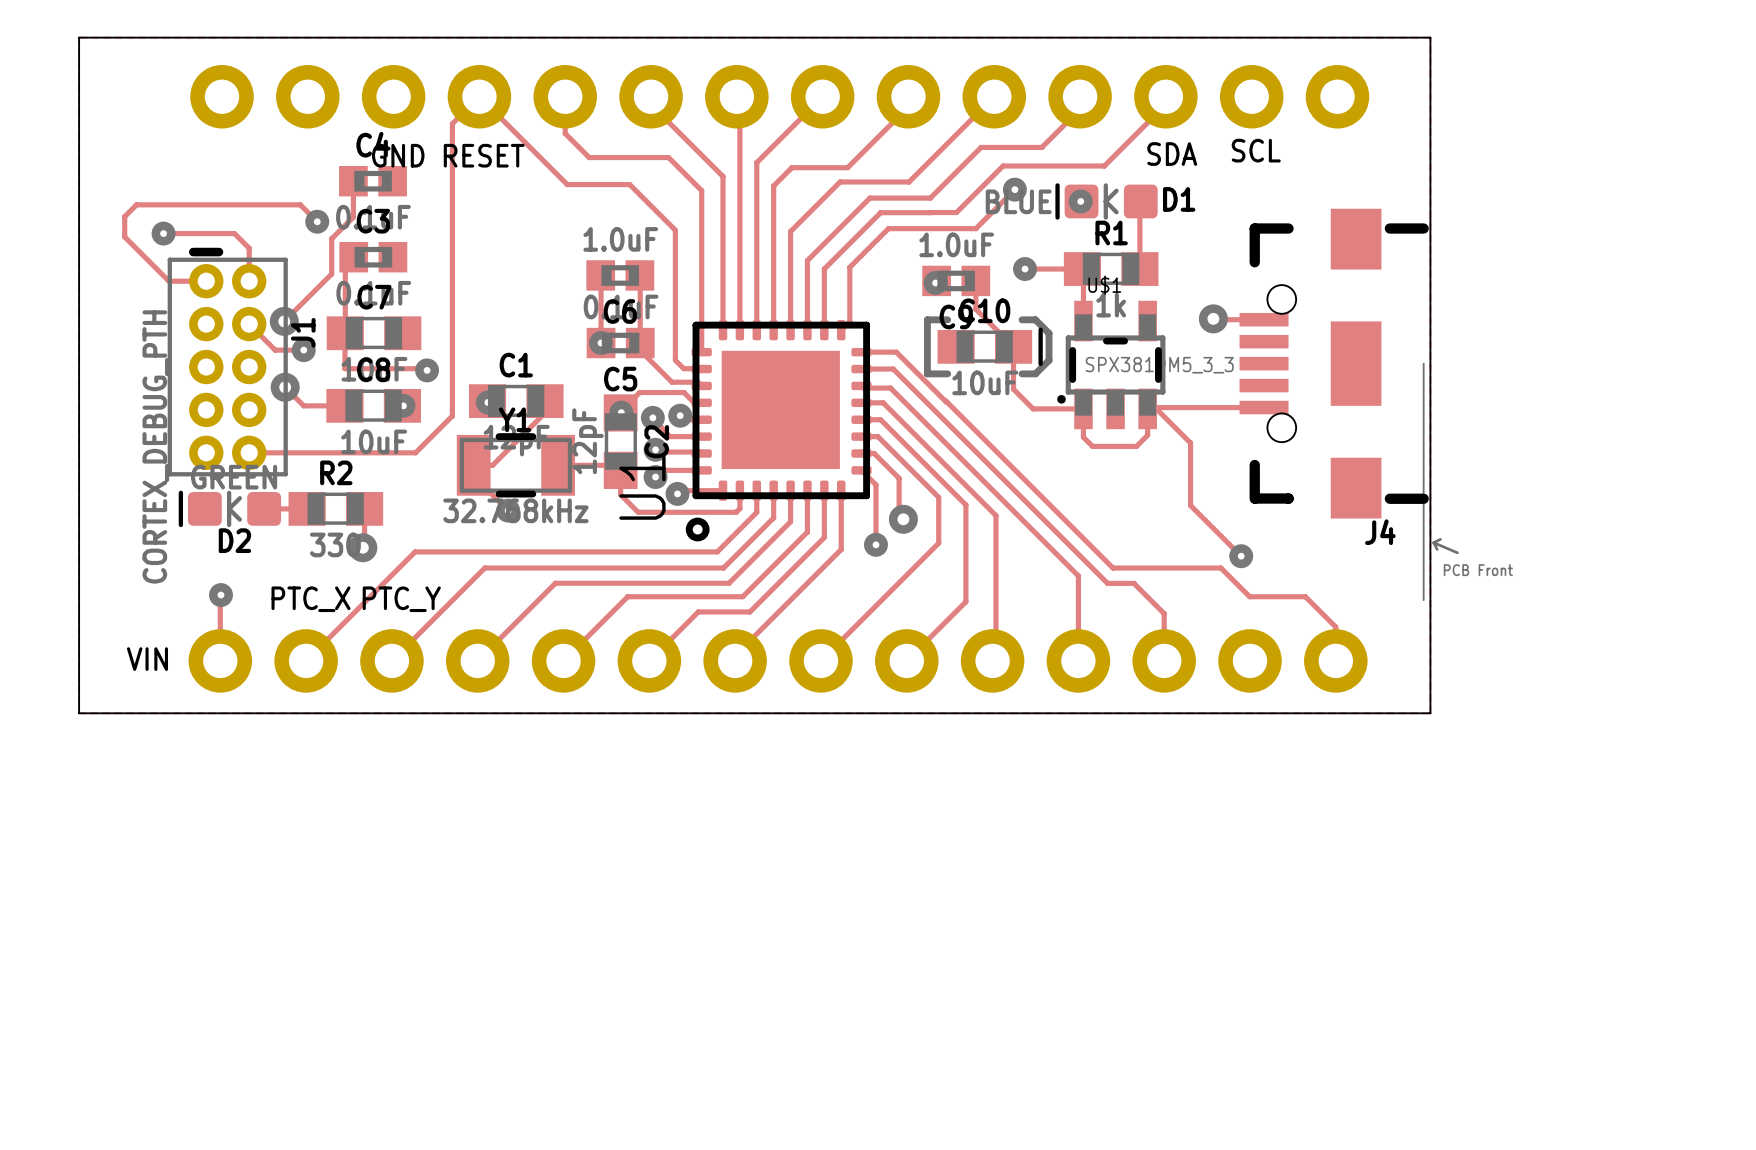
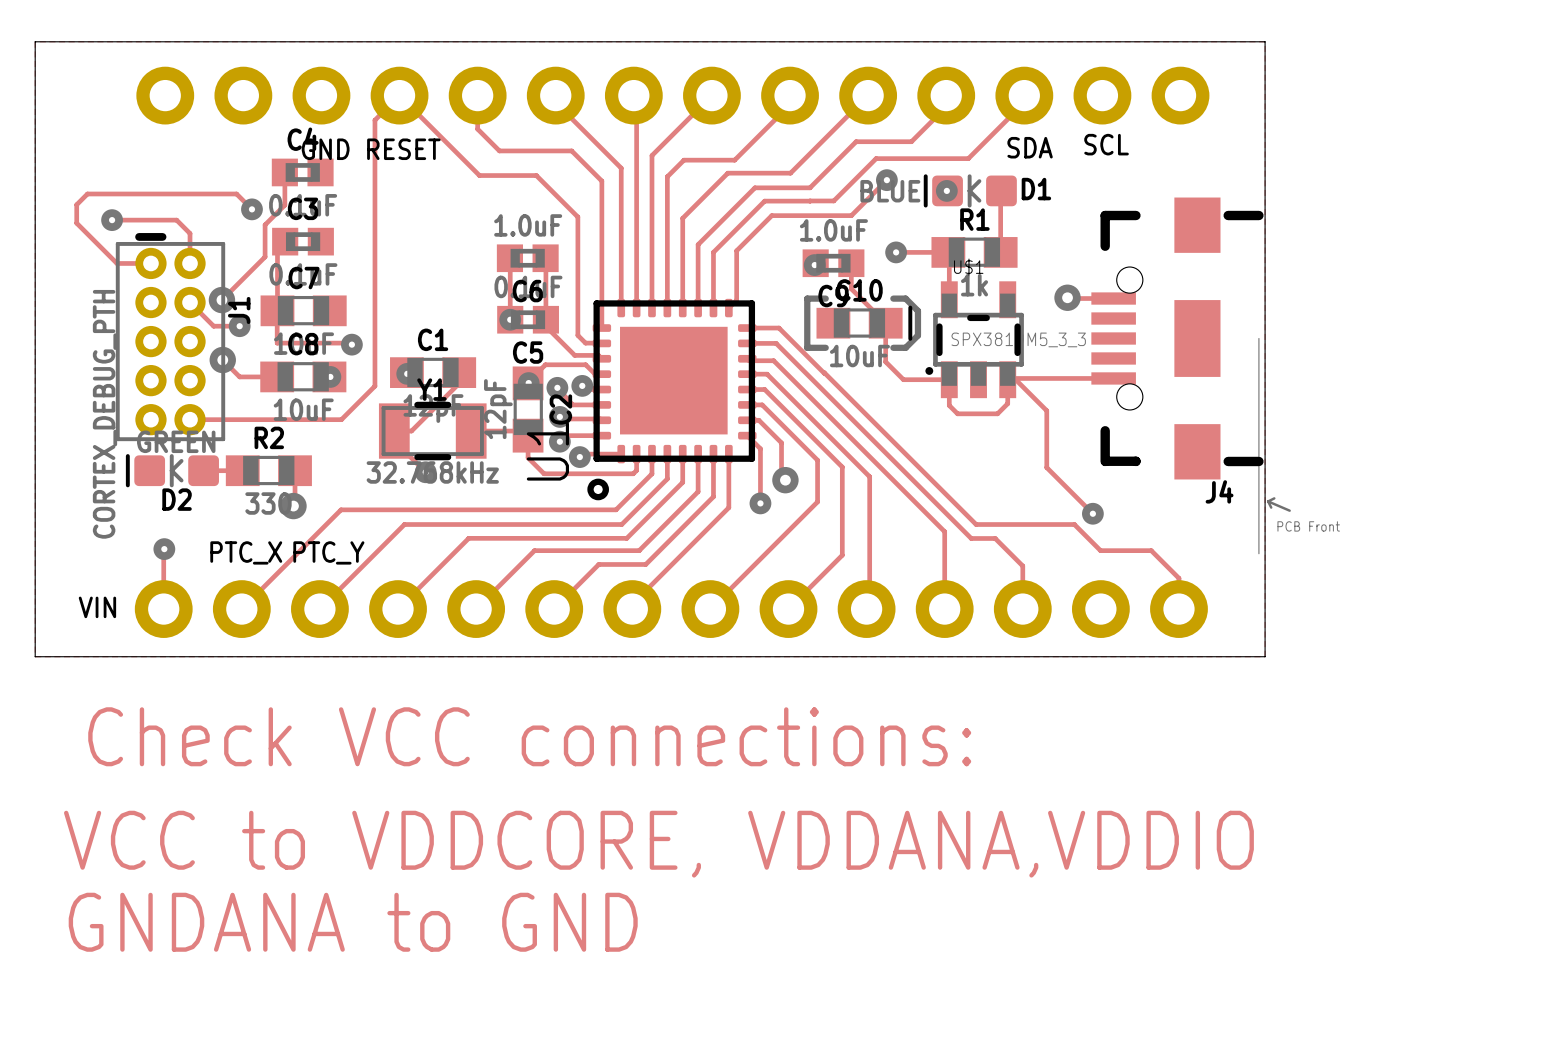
text: none -> Check VCC connections: (529, 736)
text: none -> VCC to VDDCORE, VDDANA,VDDIO (658, 844)
text: none -> GNDANA to GND (353, 922)

